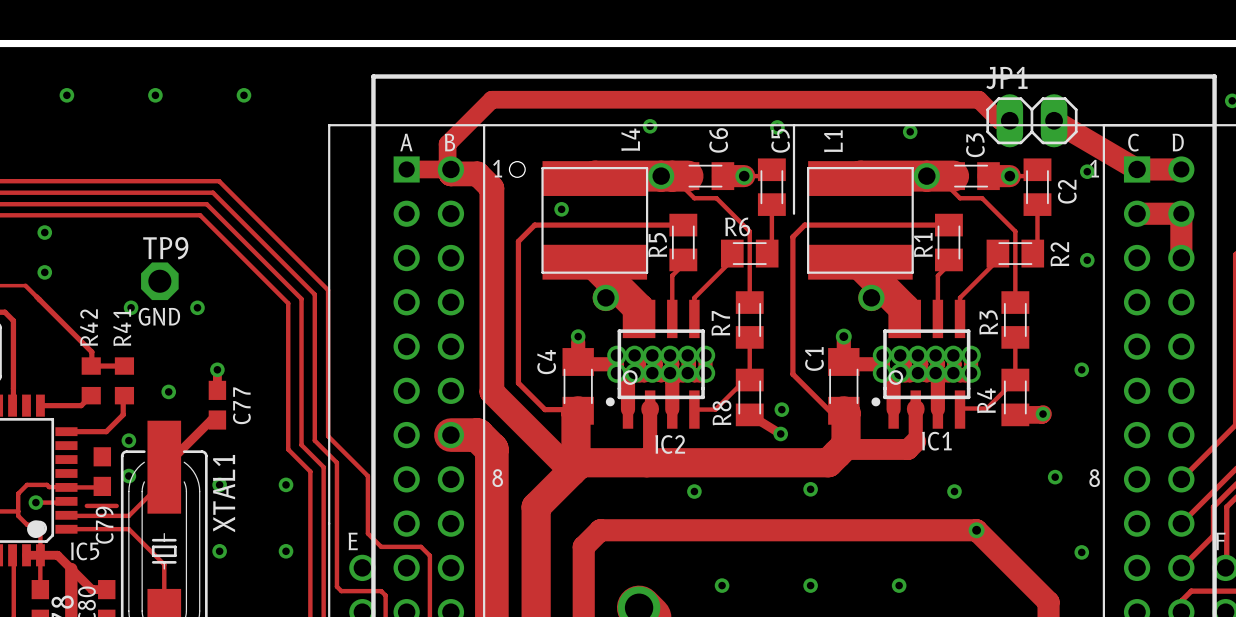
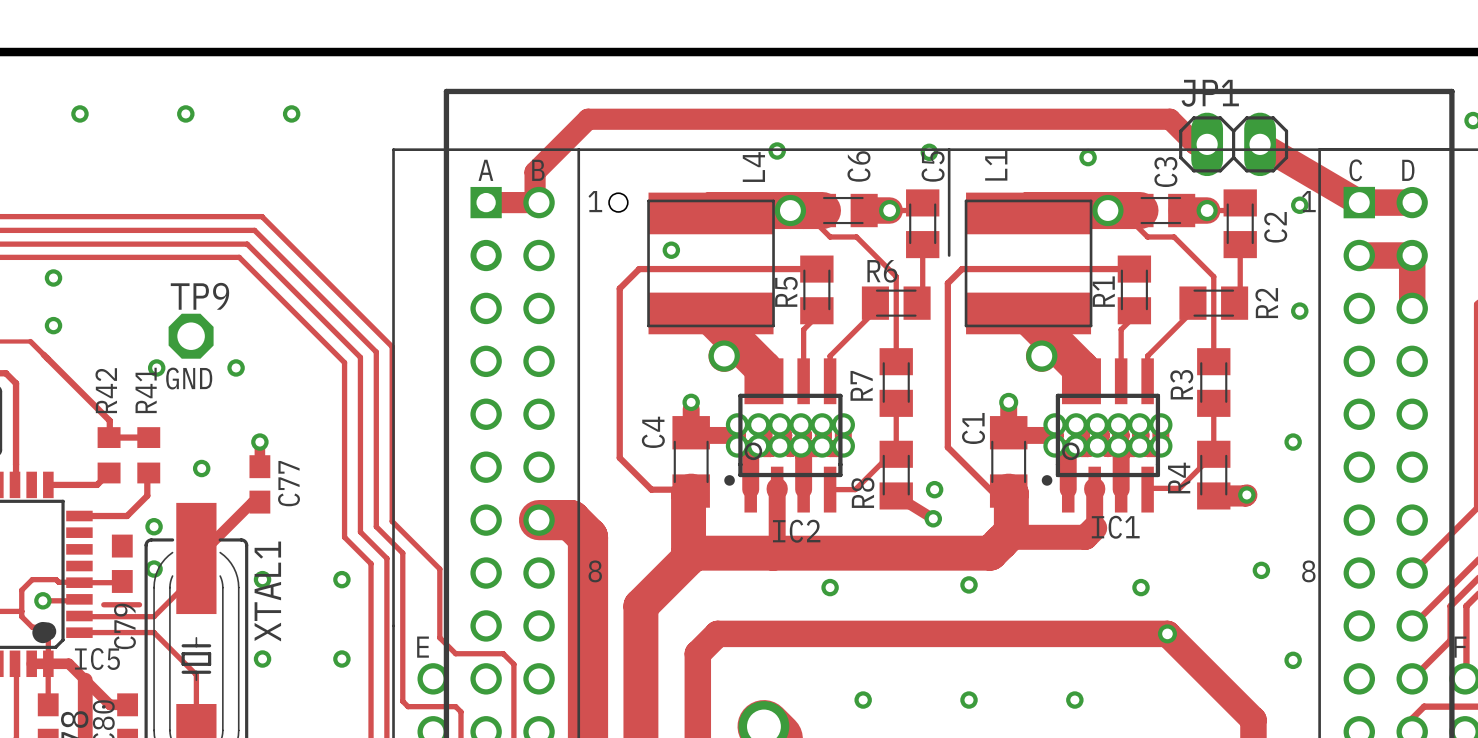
track: (450, 169) (450, 173) (477, 173) (491, 188) (491, 391) (571, 471) -> none

